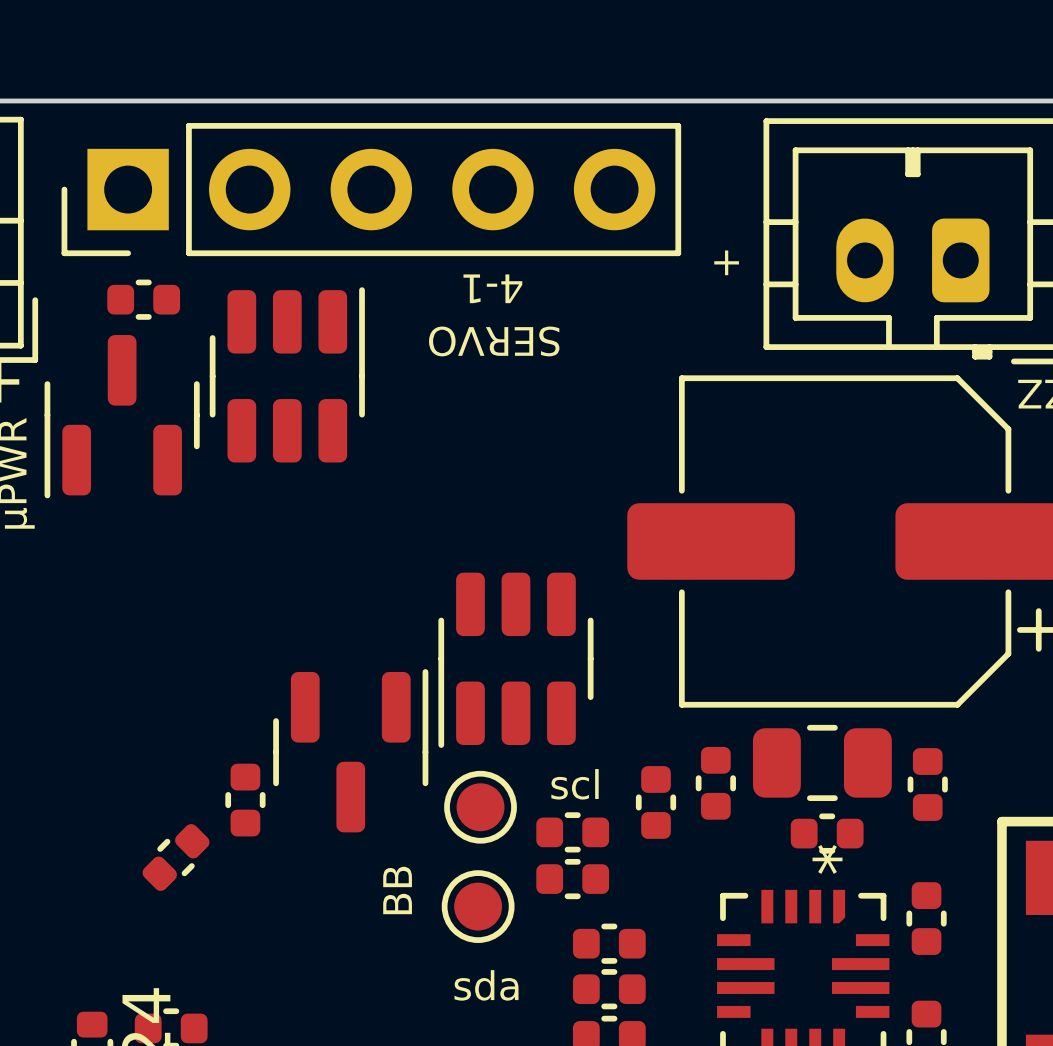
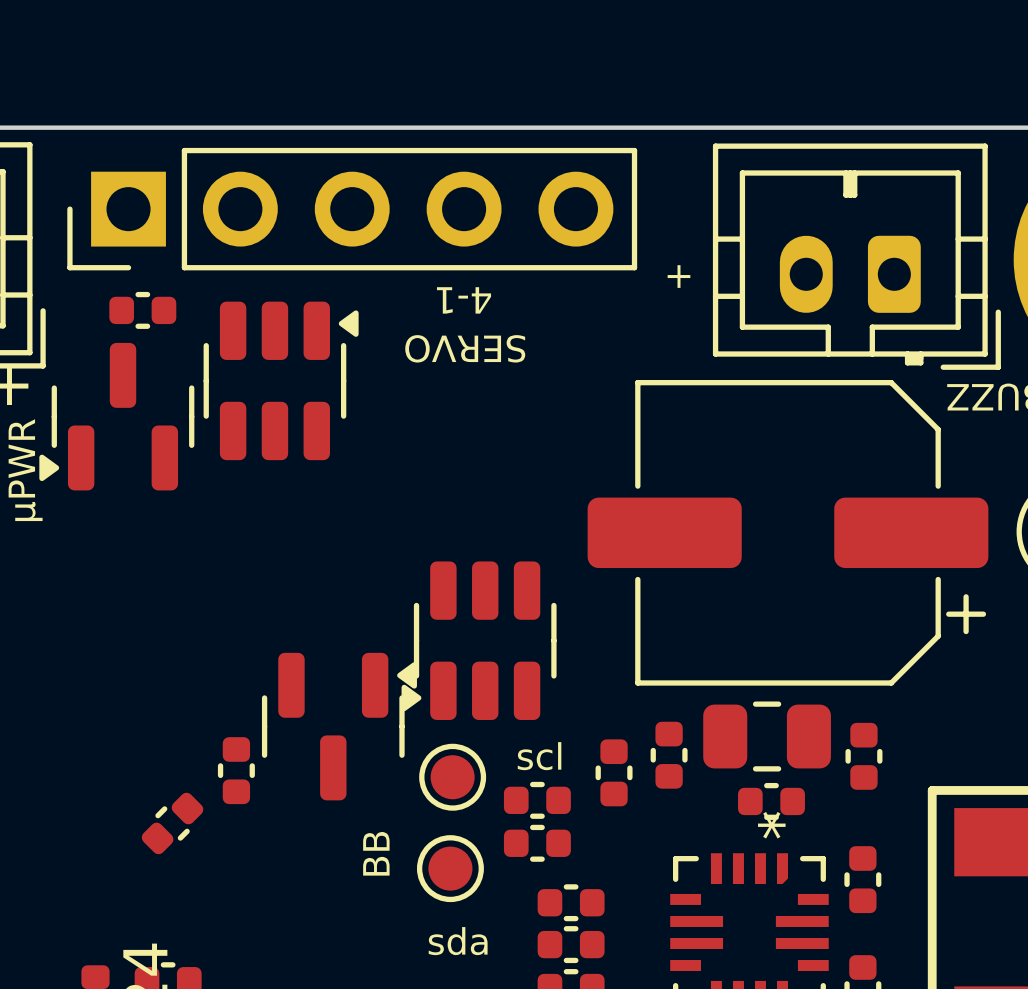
part footprint: [209, 287, 365, 463] -> [203, 301, 359, 461]
part footprint: [44, 335, 200, 499] -> [39, 342, 195, 491]
part footprint: [438, 572, 594, 748] -> [401, 561, 557, 720]
part footprint: [273, 669, 429, 833] -> [261, 652, 417, 801]

